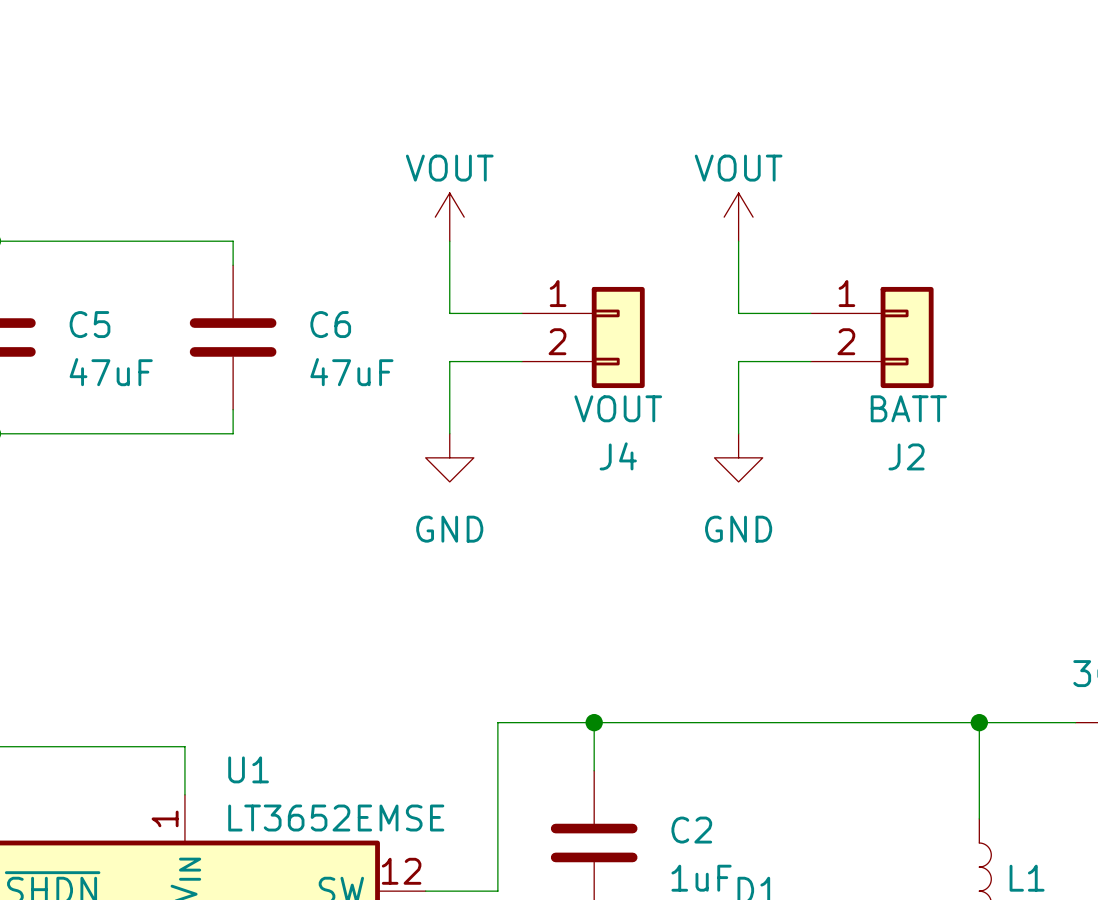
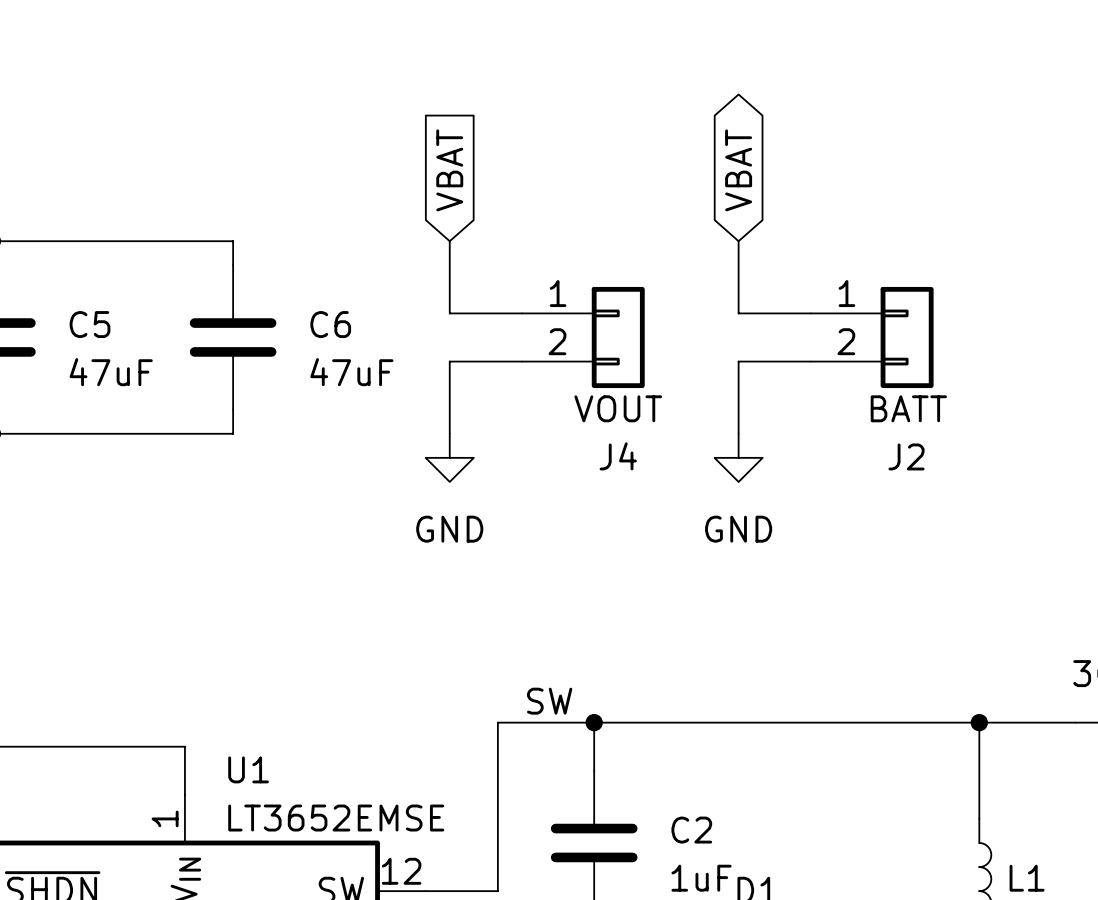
global label: none -> VBAT (449, 170)
global label: none -> VBAT (738, 170)
power symbol: VOUT (449, 217) -> none
power symbol: VOUT (738, 217) -> none
label: none -> SW (549, 701)

